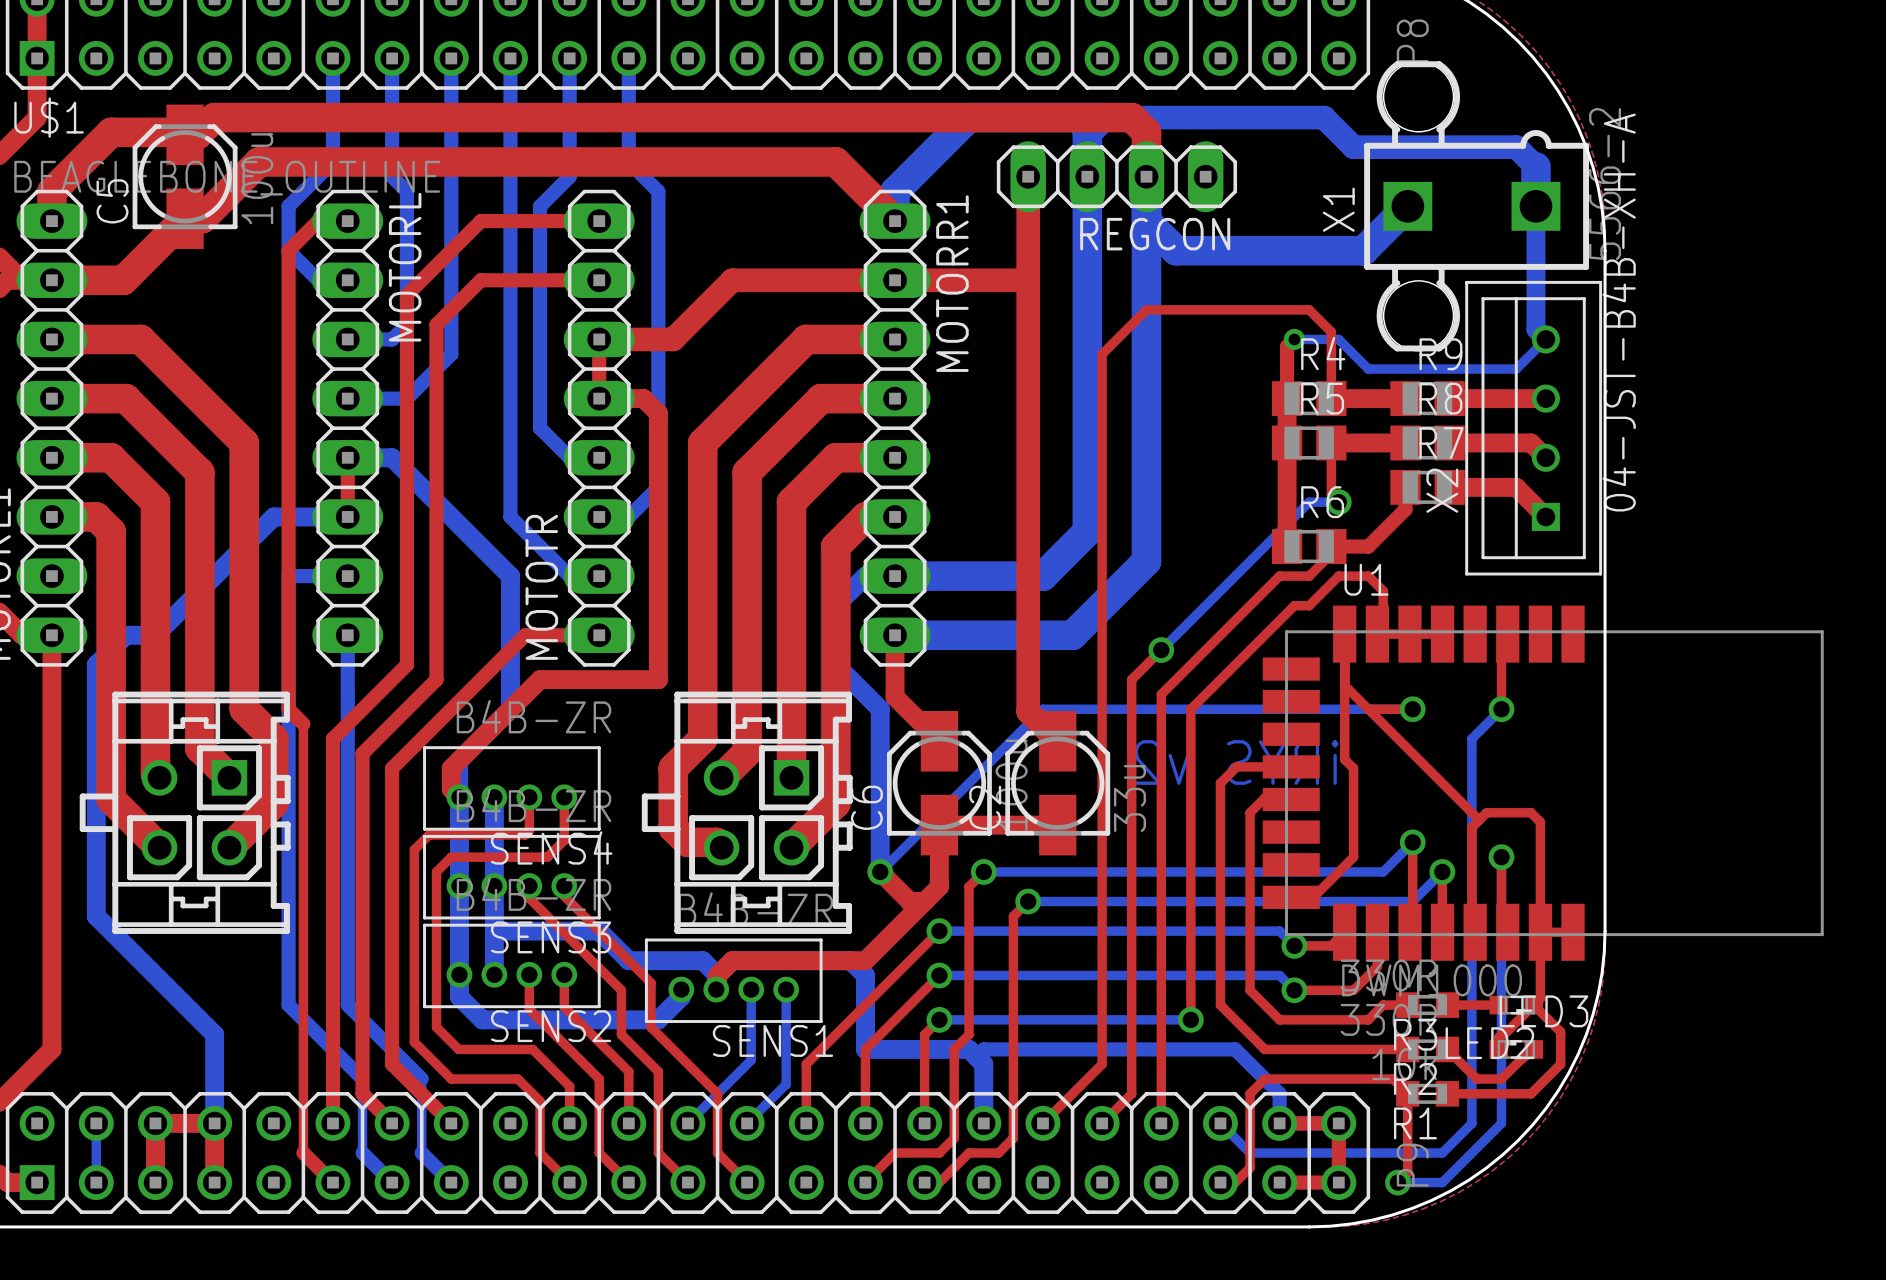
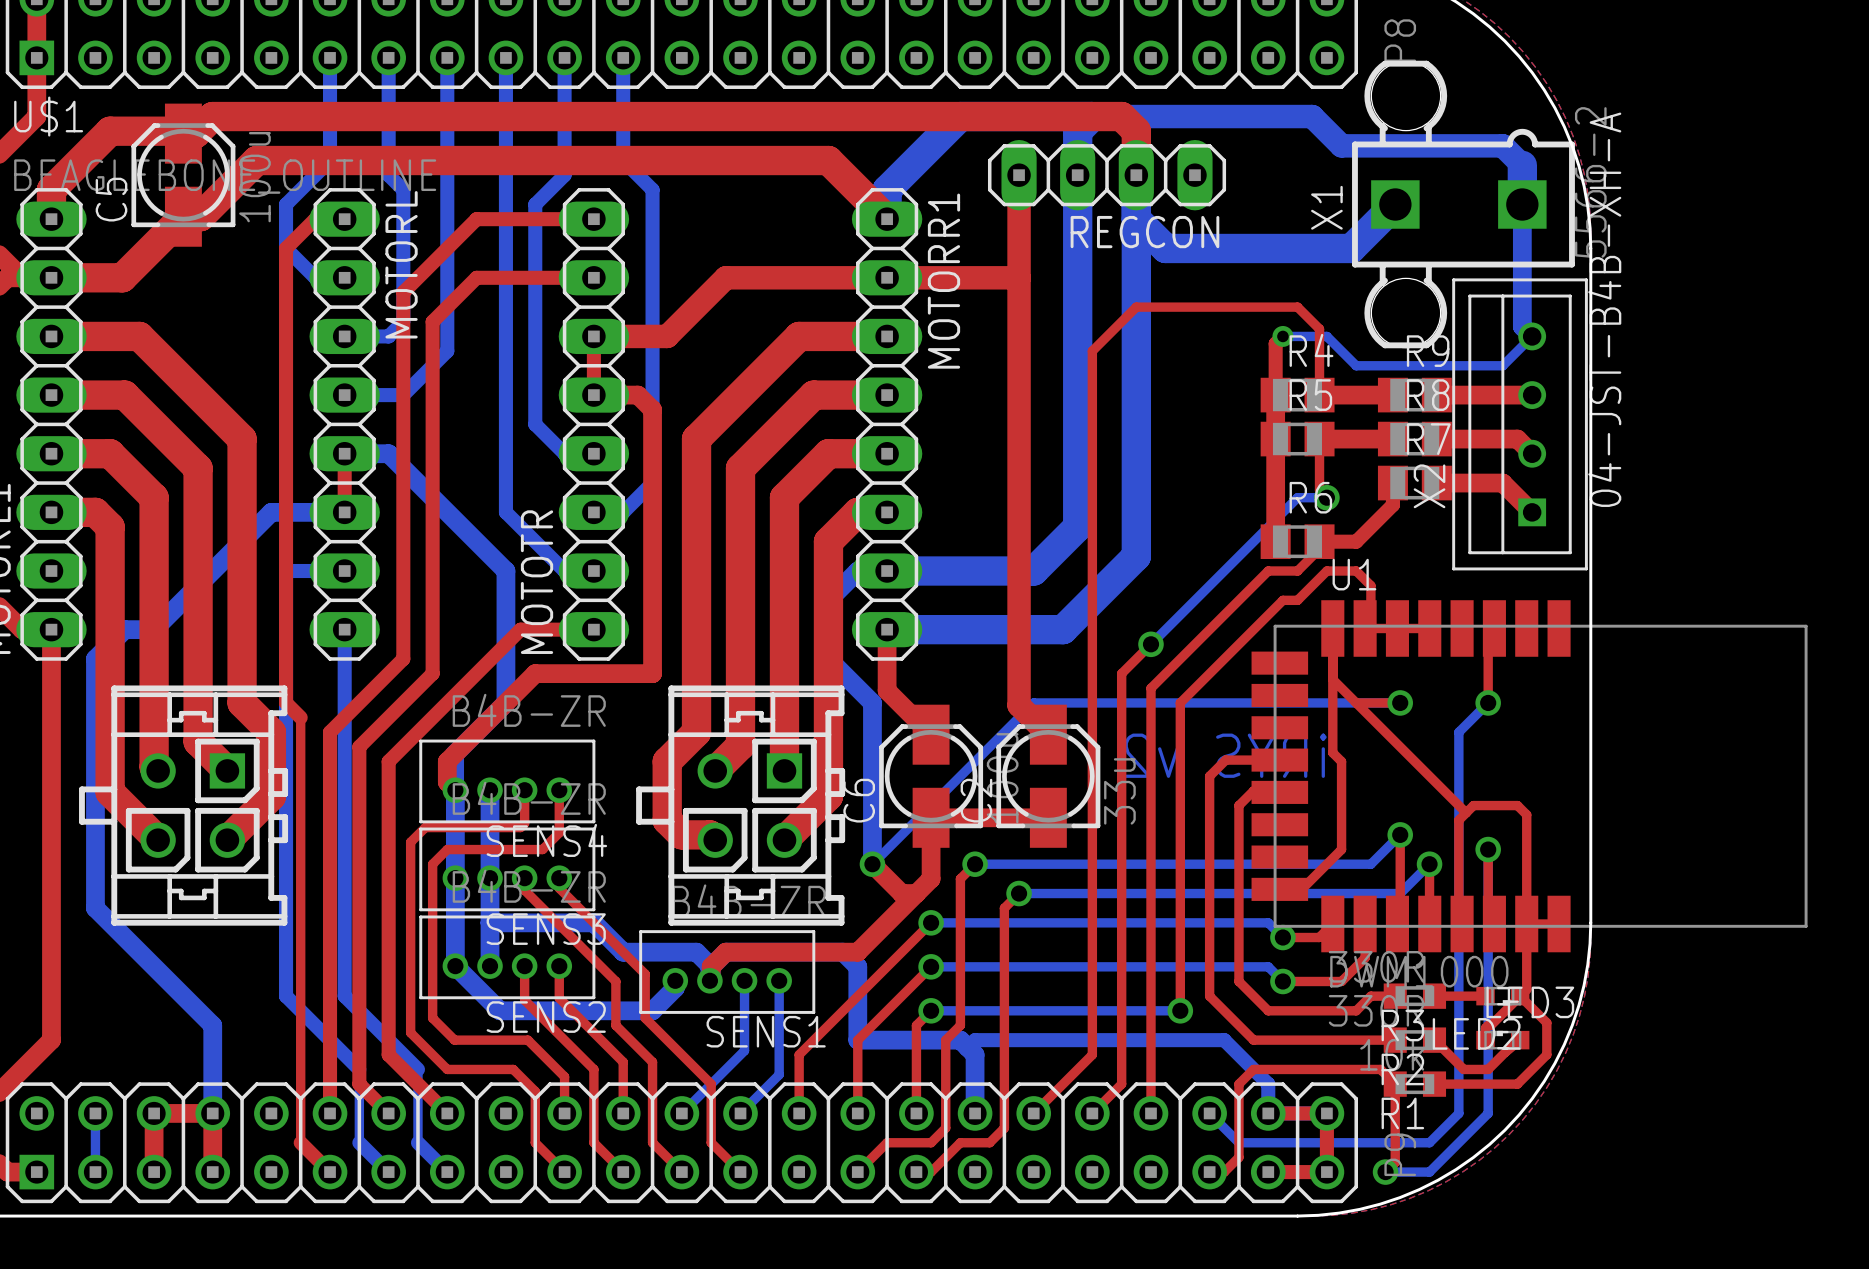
bottom track: (459, 974) (459, 996) (482, 1019) (504, 1019) -> (455, 966) (500, 1010)

